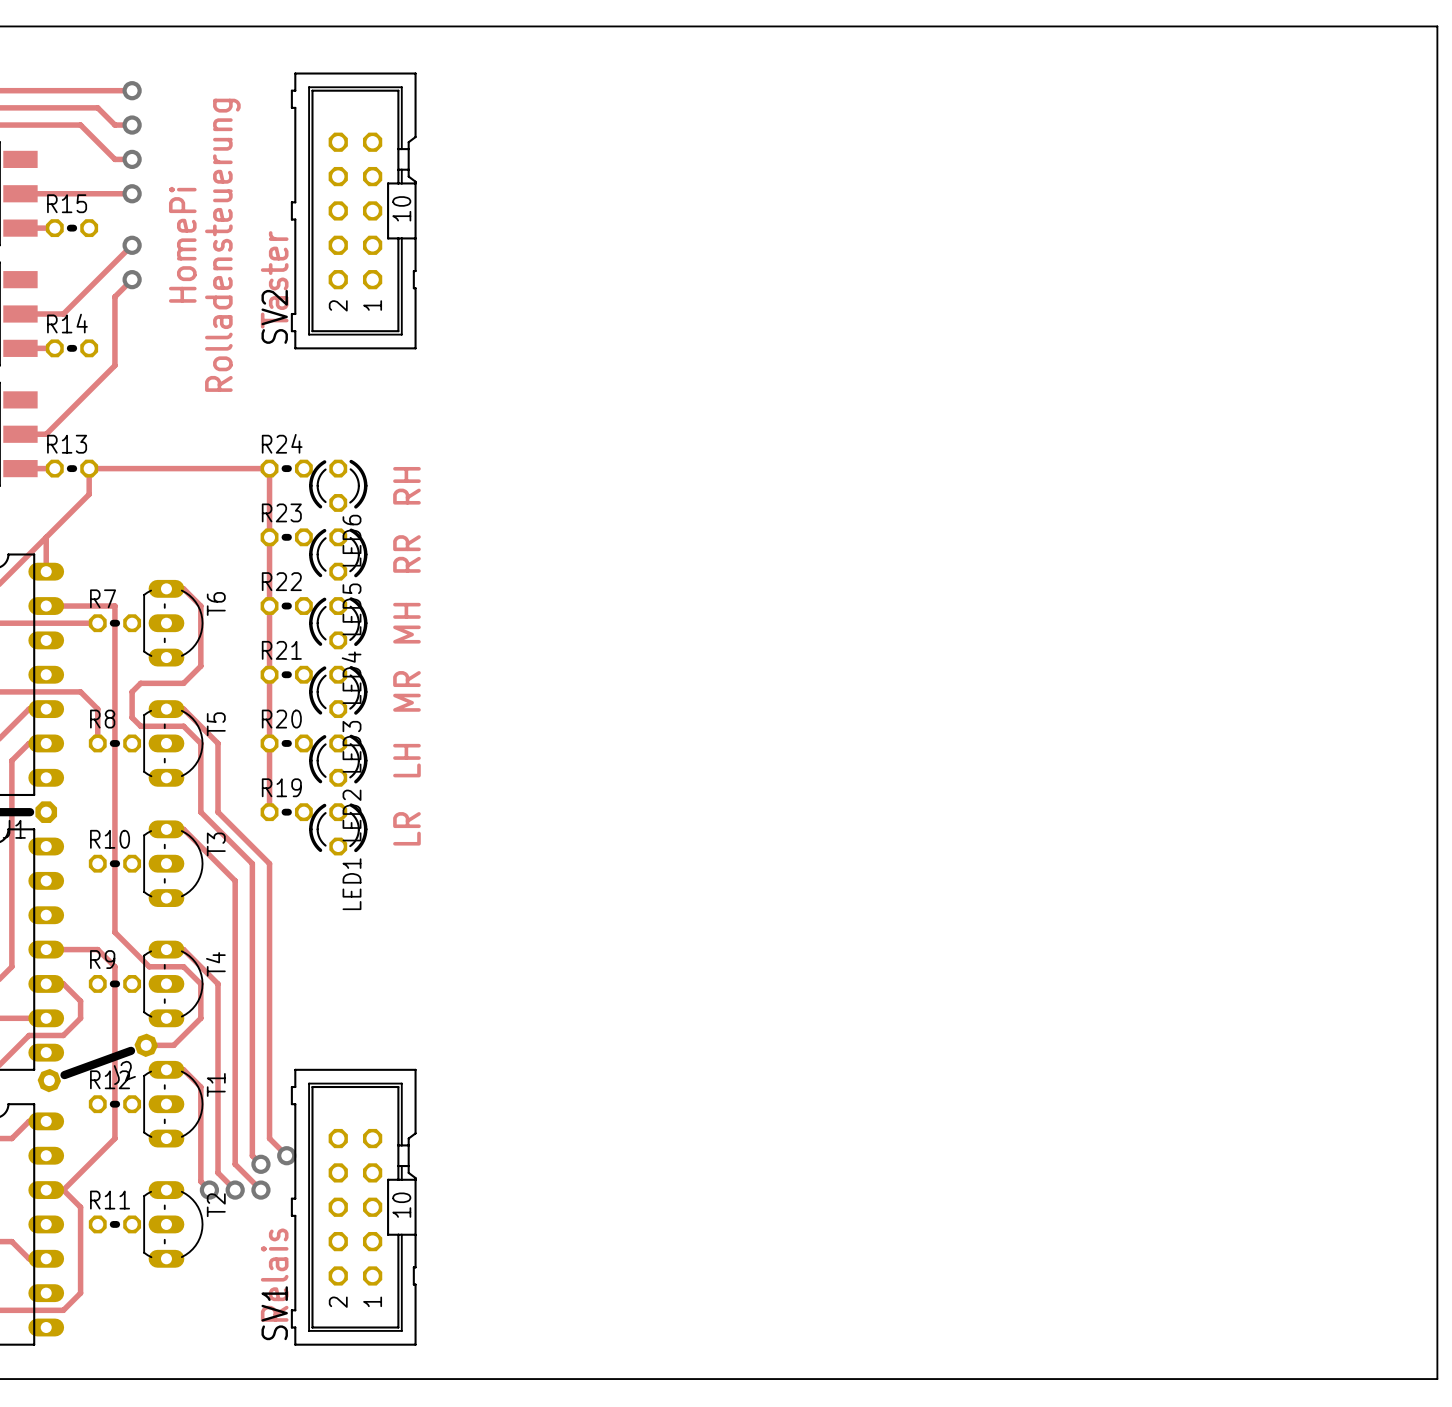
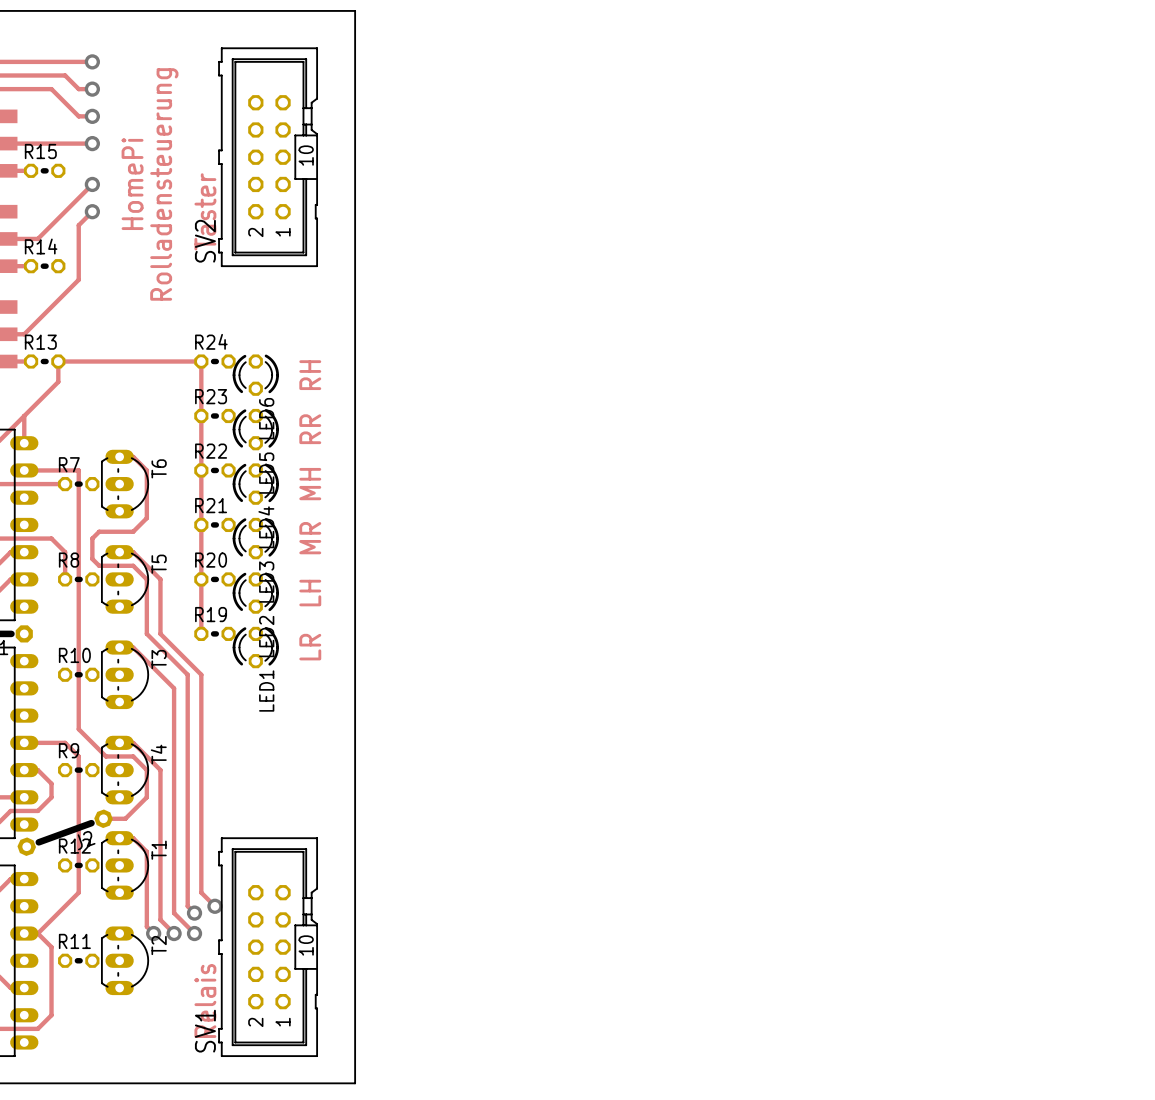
board edge: (463, 26) (1437, 26) (1437, 1379) (463, 1379) -> (355, 10) (355, 1083)

